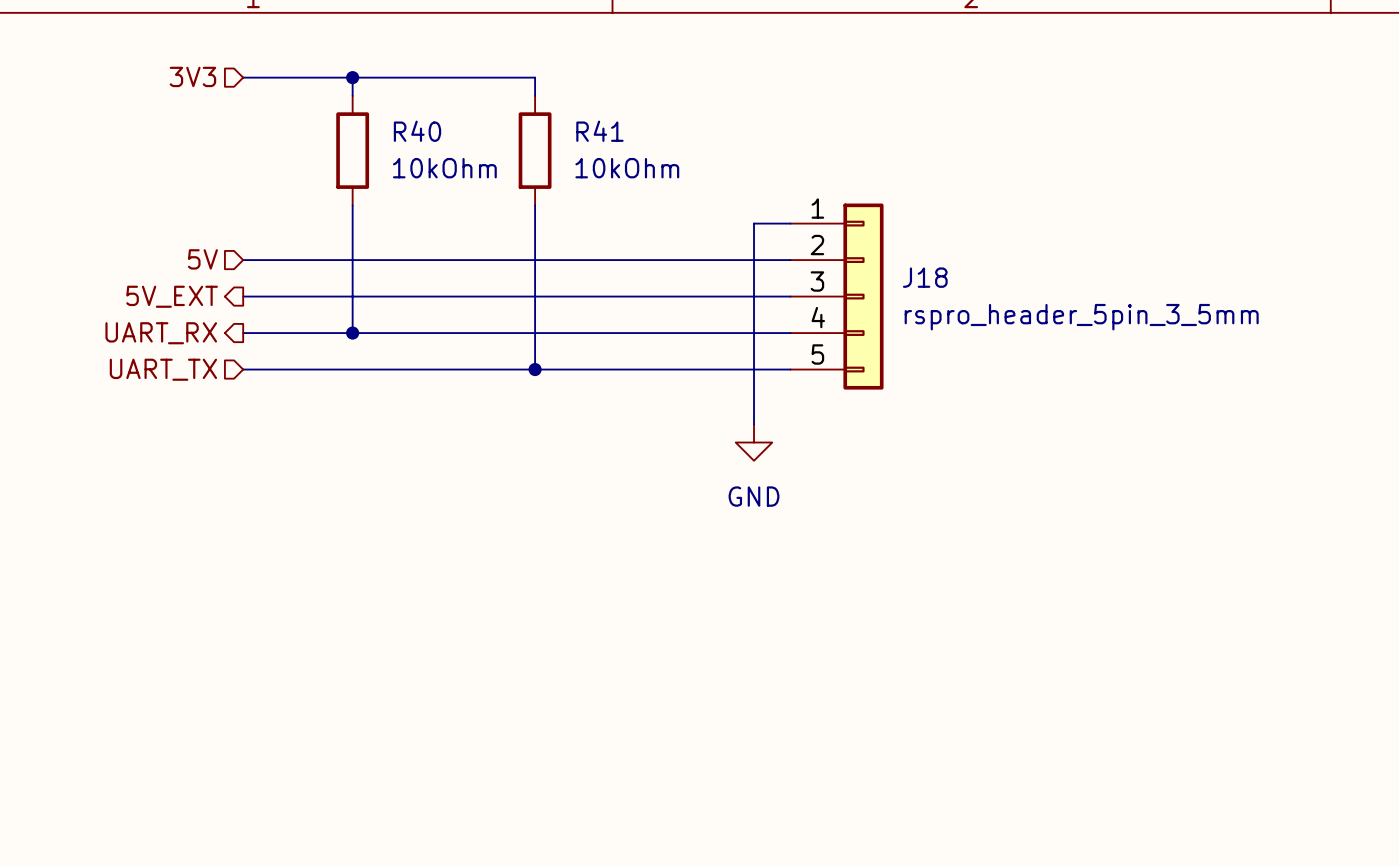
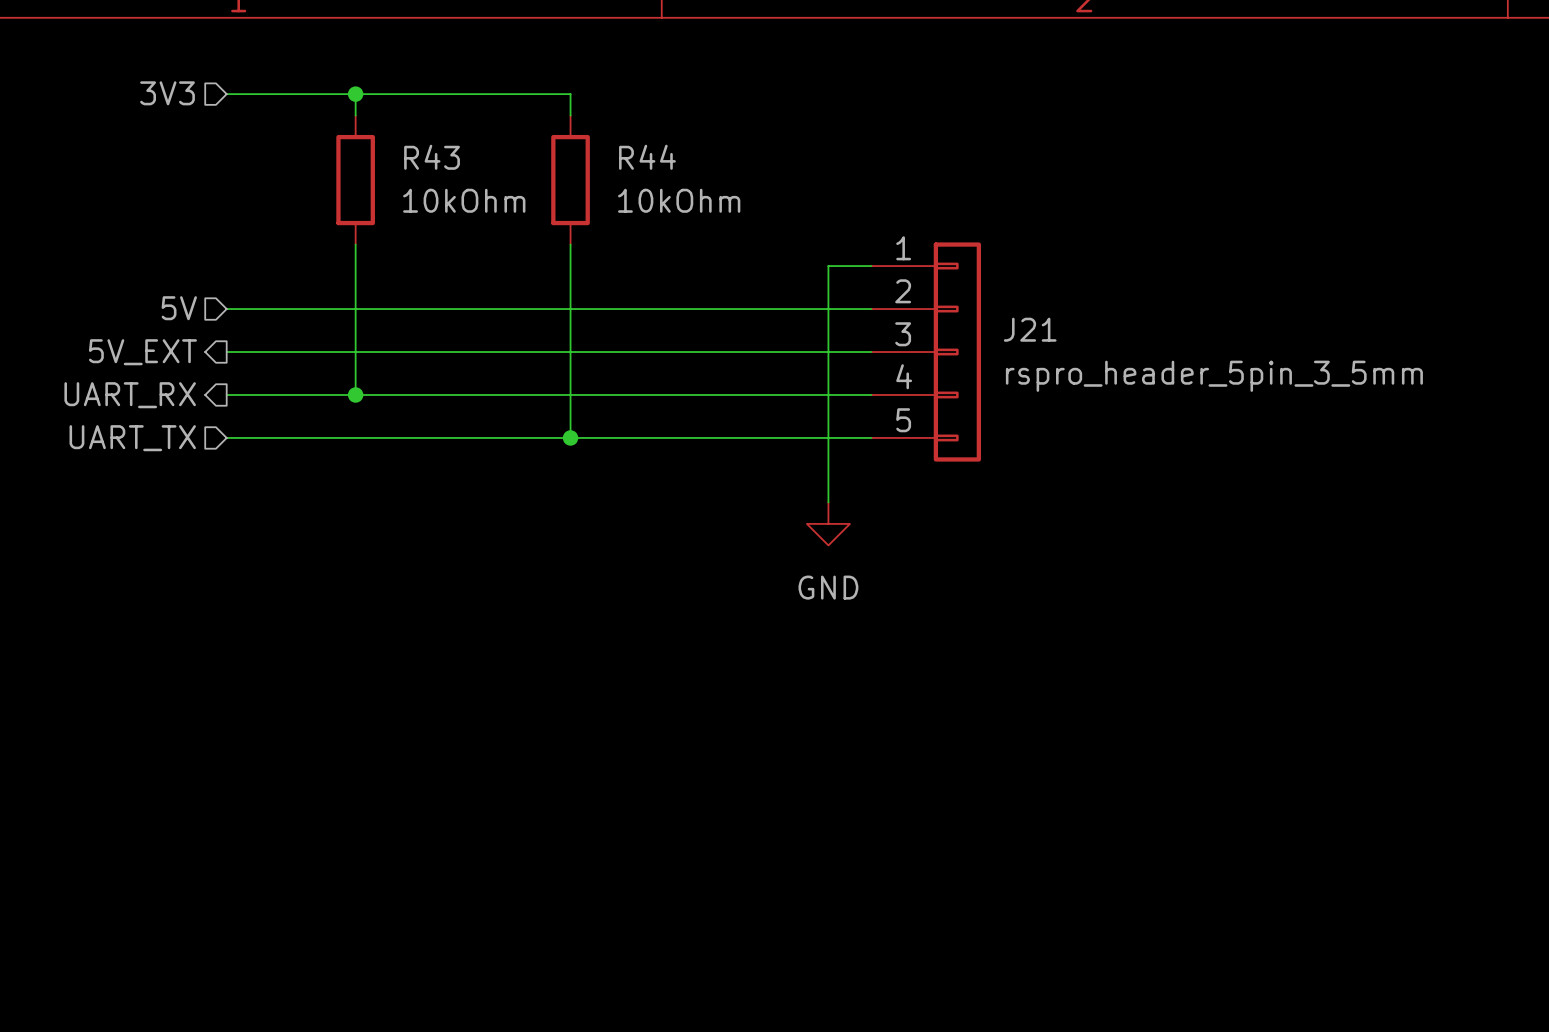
R40 name: R40 (417, 131) -> R43 (432, 157)
R41 name: R41 (599, 131) -> R44 (647, 157)
J18 name: J18 (925, 277) -> J21 (1030, 329)

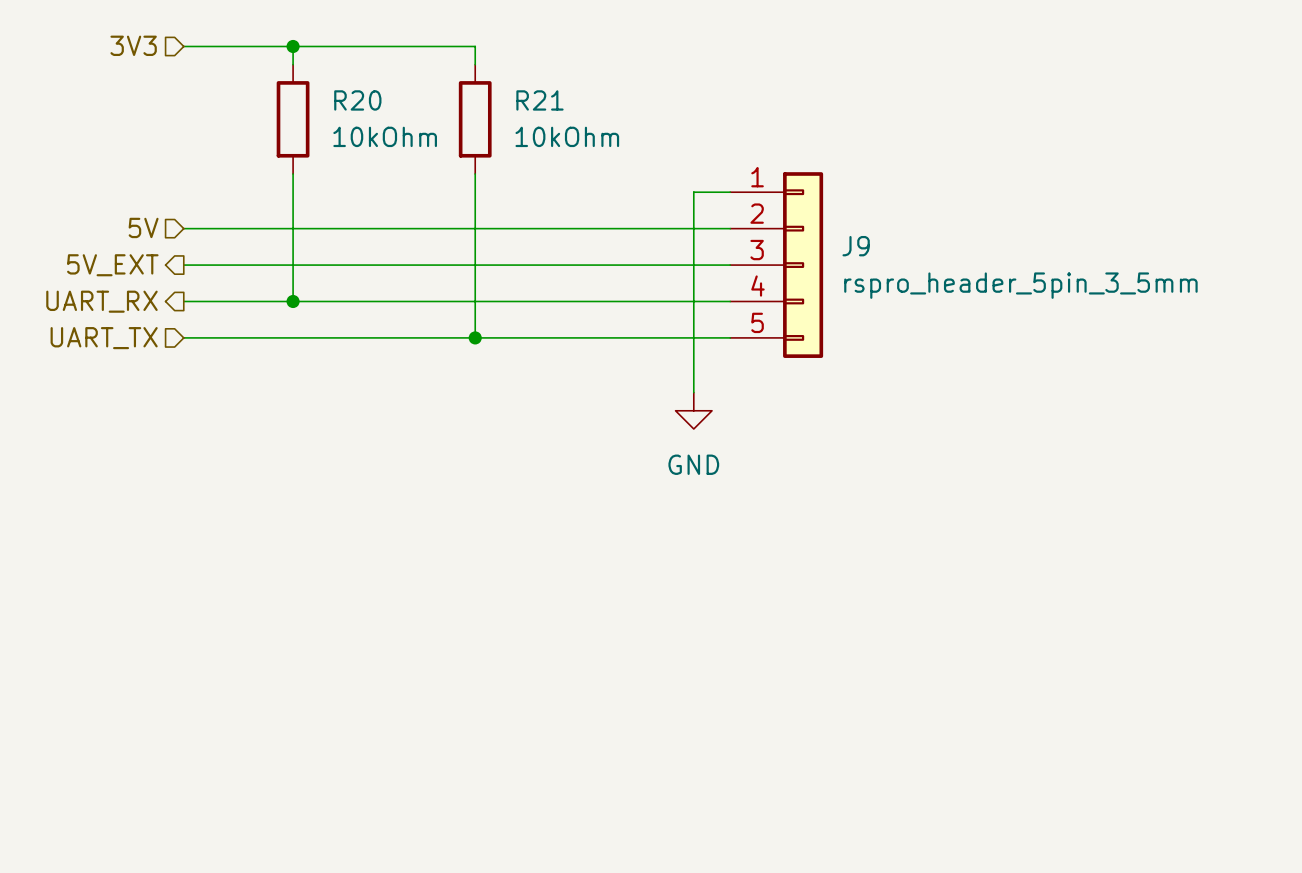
R43 name: R43 (432, 157) -> R20 (357, 100)
R44 name: R44 (647, 157) -> R21 (539, 100)
J21 name: J21 (1030, 329) -> J9 (856, 246)

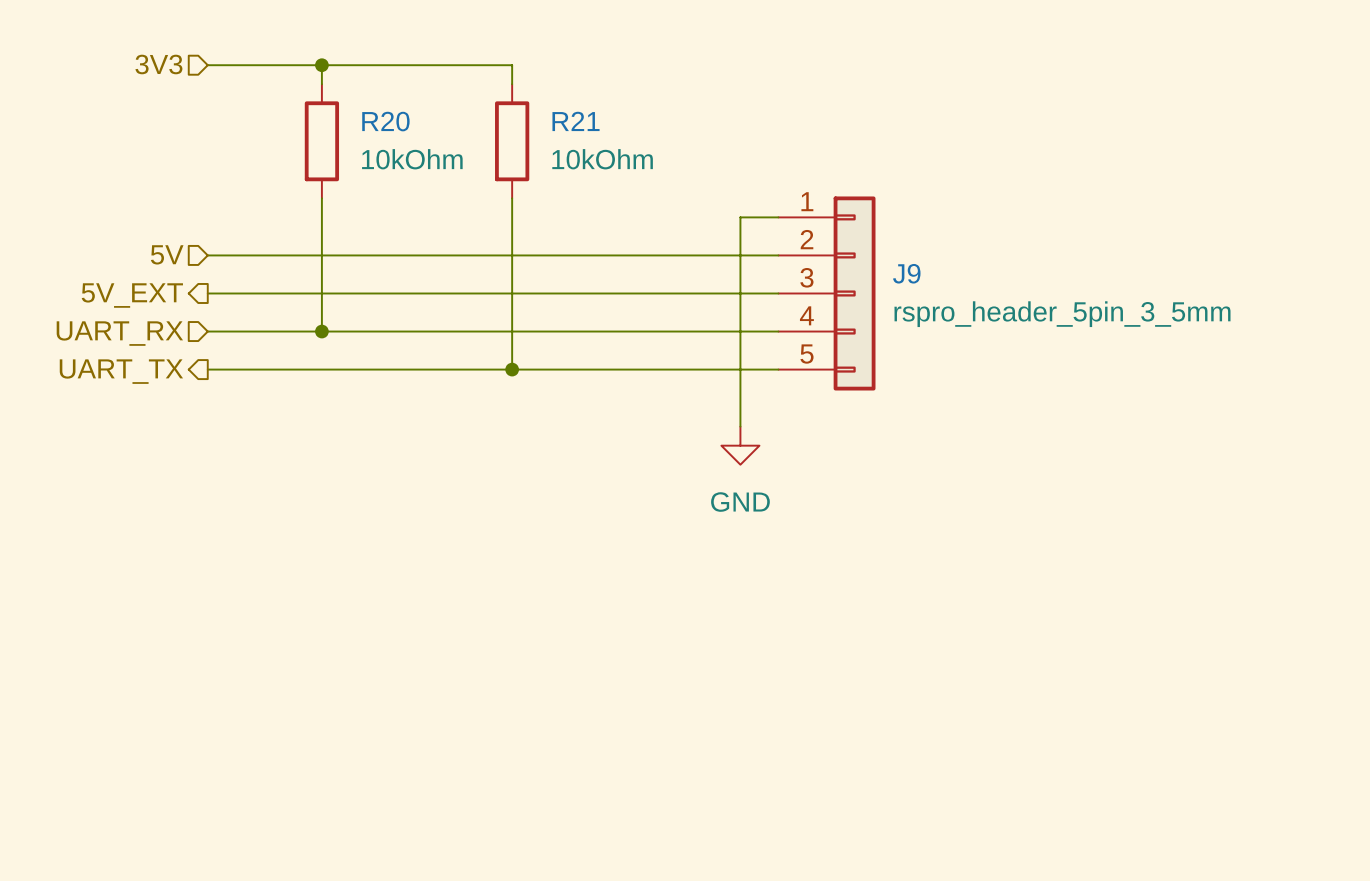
hierarchical label shape: output (101, 301) -> input (119, 333)
hierarchical label shape: input (104, 338) -> output (121, 371)

